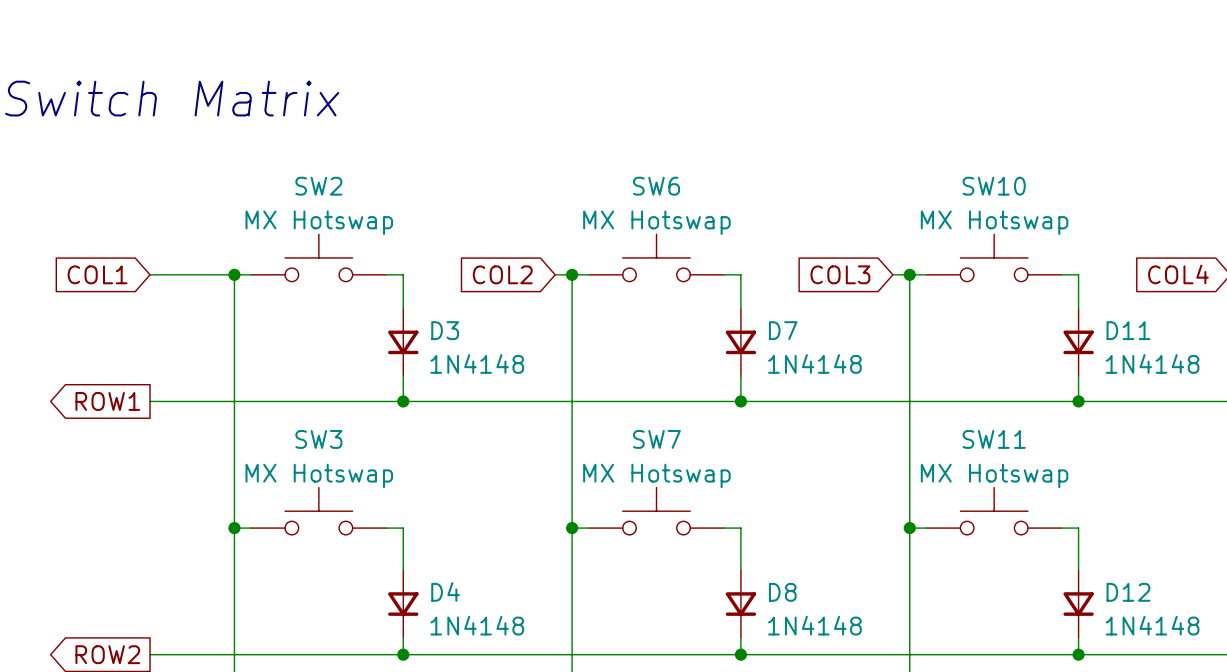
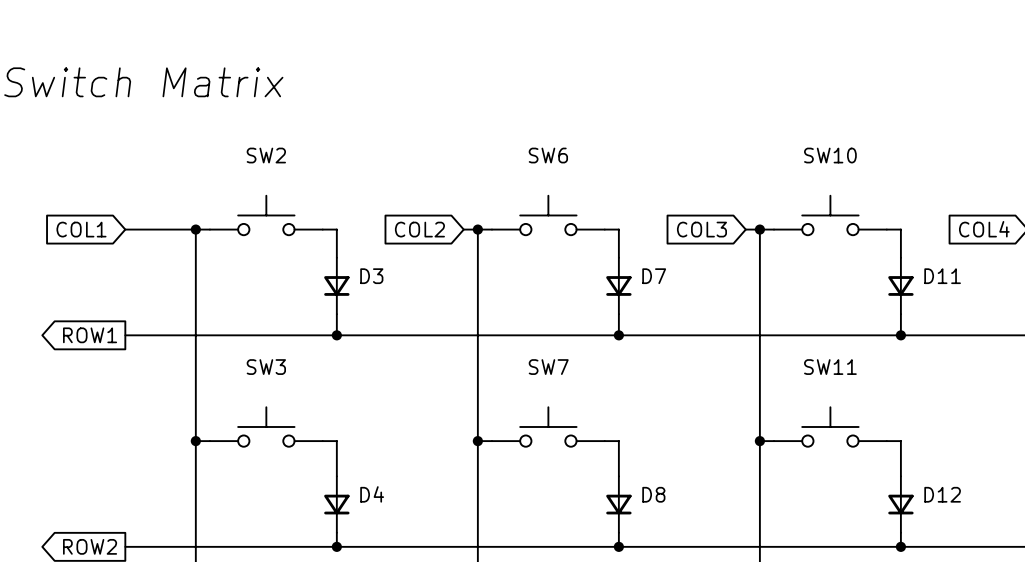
SW2 value: MX Hotswap (319, 222) -> none
SW6 value: MX Hotswap (656, 222) -> none
SW10 value: MX Hotswap (994, 222) -> none
D3 value: 1N4148 (477, 363) -> none
D7 value: 1N4148 (814, 363) -> none
D11 value: 1N4148 (1152, 363) -> none
SW3 value: MX Hotswap (319, 475) -> none
SW7 value: MX Hotswap (656, 475) -> none
SW11 value: MX Hotswap (994, 475) -> none
D4 value: 1N4148 (477, 625) -> none
D8 value: 1N4148 (814, 625) -> none
D12 value: 1N4148 (1152, 625) -> none

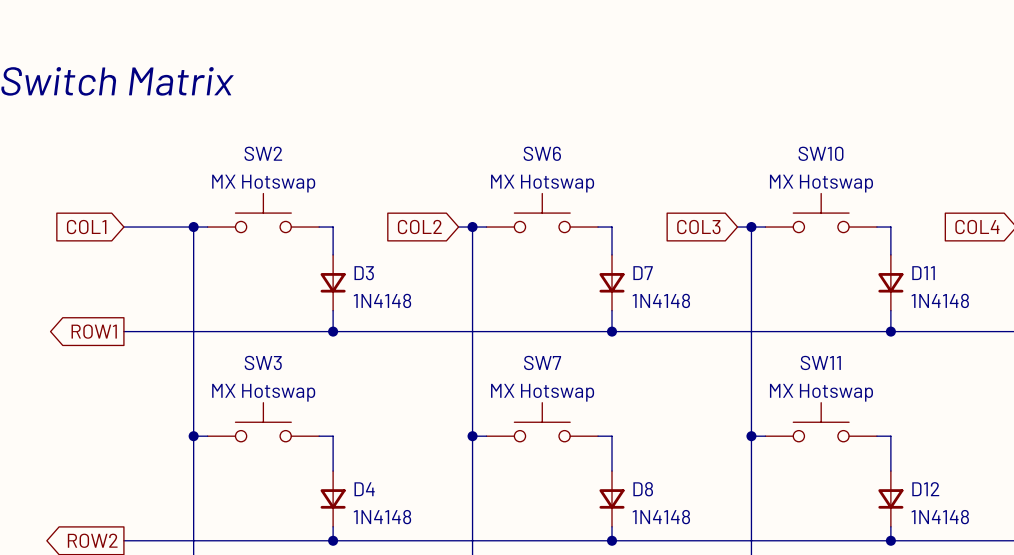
SW2 value: none -> MX Hotswap (263, 183)
SW6 value: none -> MX Hotswap (542, 183)
SW10 value: none -> MX Hotswap (821, 183)
D3 value: none -> 1N4148 (382, 300)
D7 value: none -> 1N4148 (661, 300)
D11 value: none -> 1N4148 (940, 300)
SW3 value: none -> MX Hotswap (263, 392)
SW7 value: none -> MX Hotswap (542, 392)
SW11 value: none -> MX Hotswap (821, 392)
D4 value: none -> 1N4148 (382, 517)
D8 value: none -> 1N4148 (661, 517)
D12 value: none -> 1N4148 (940, 517)

